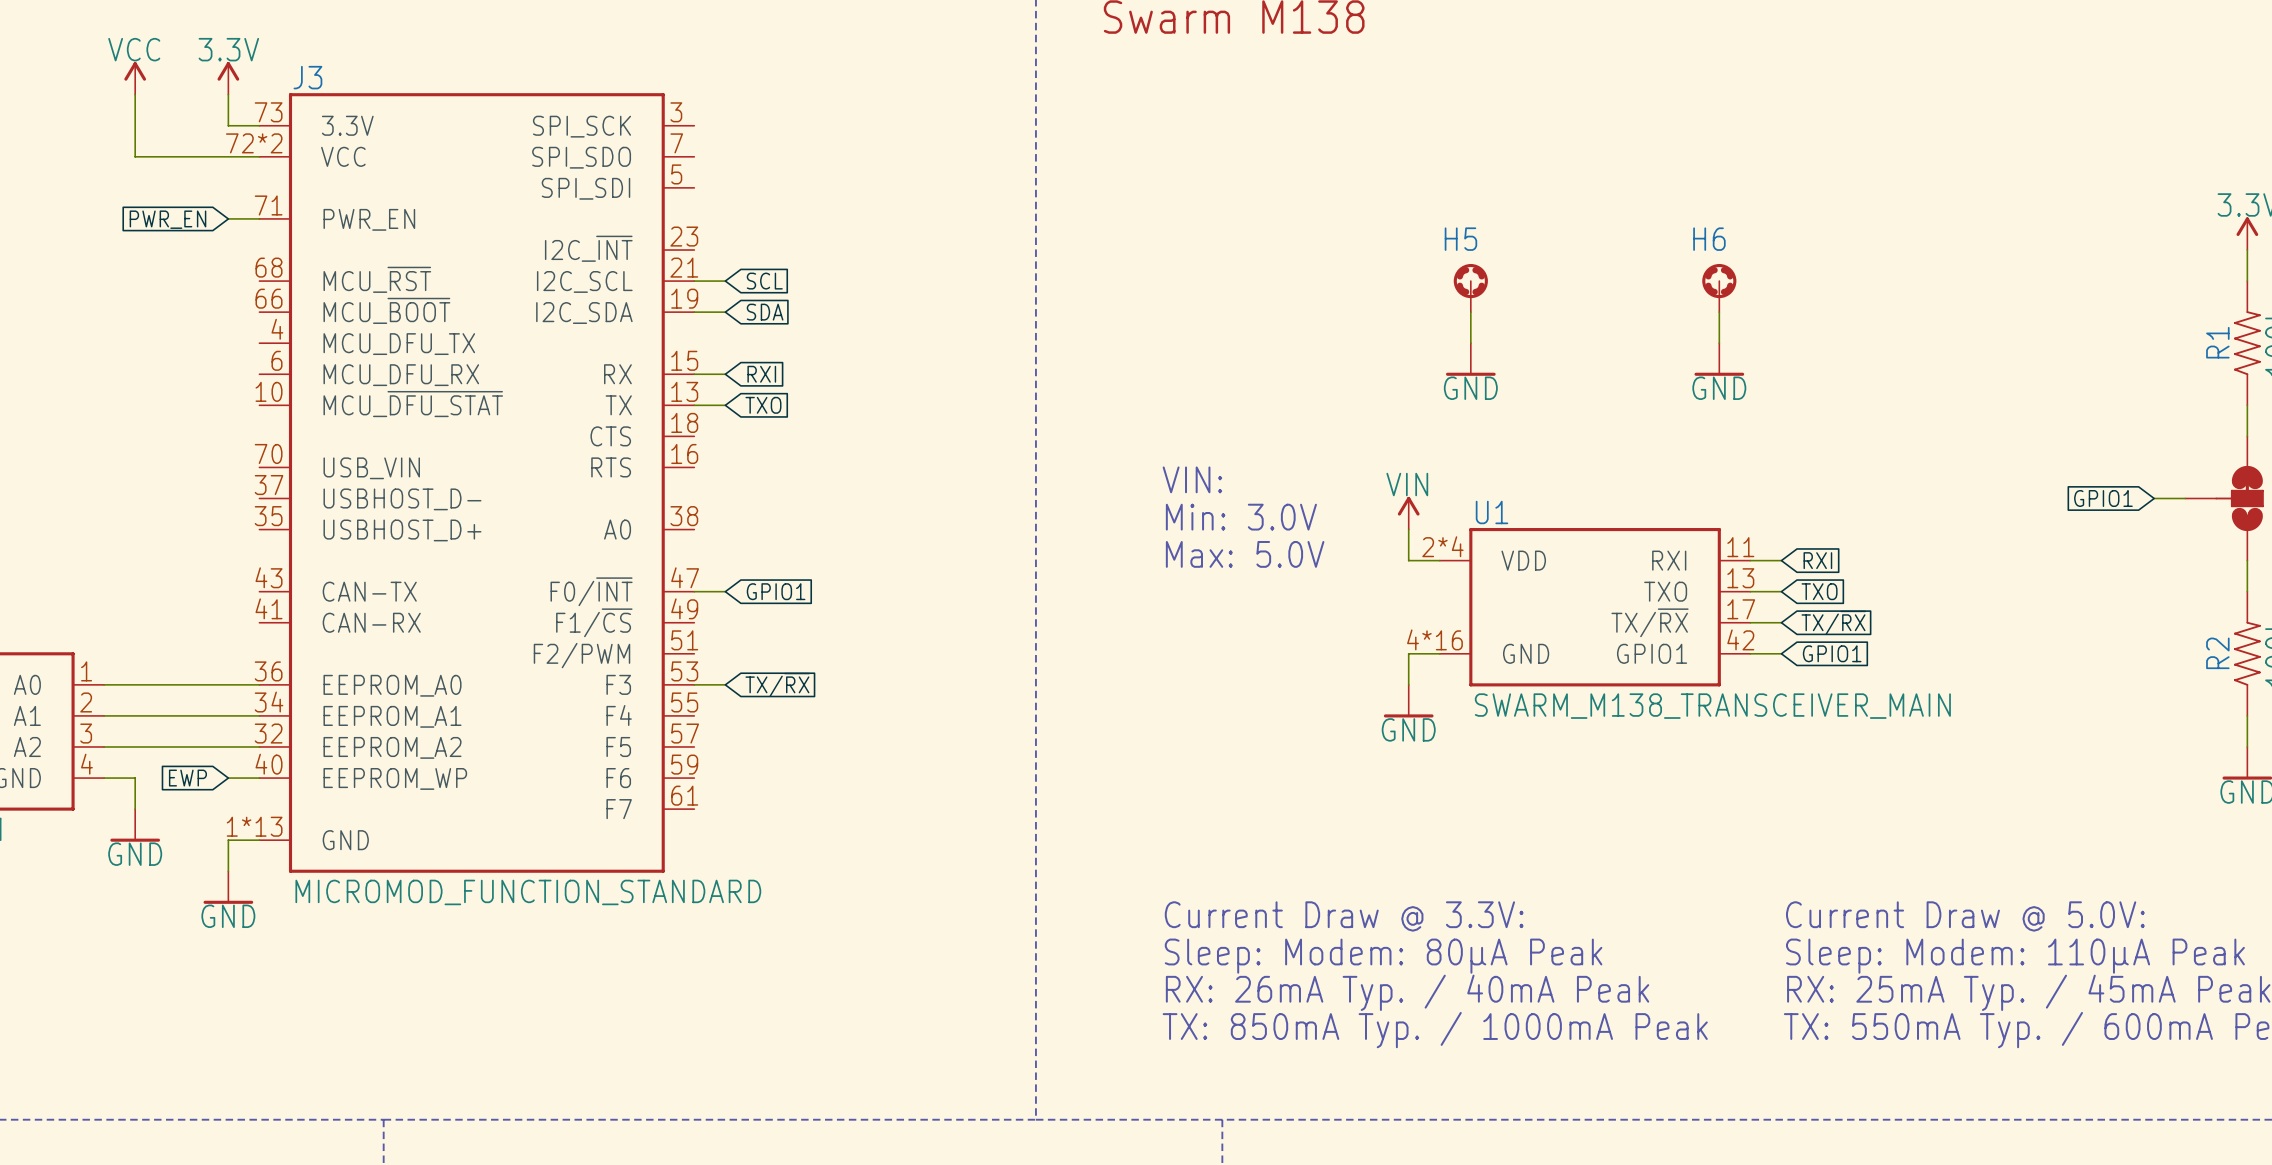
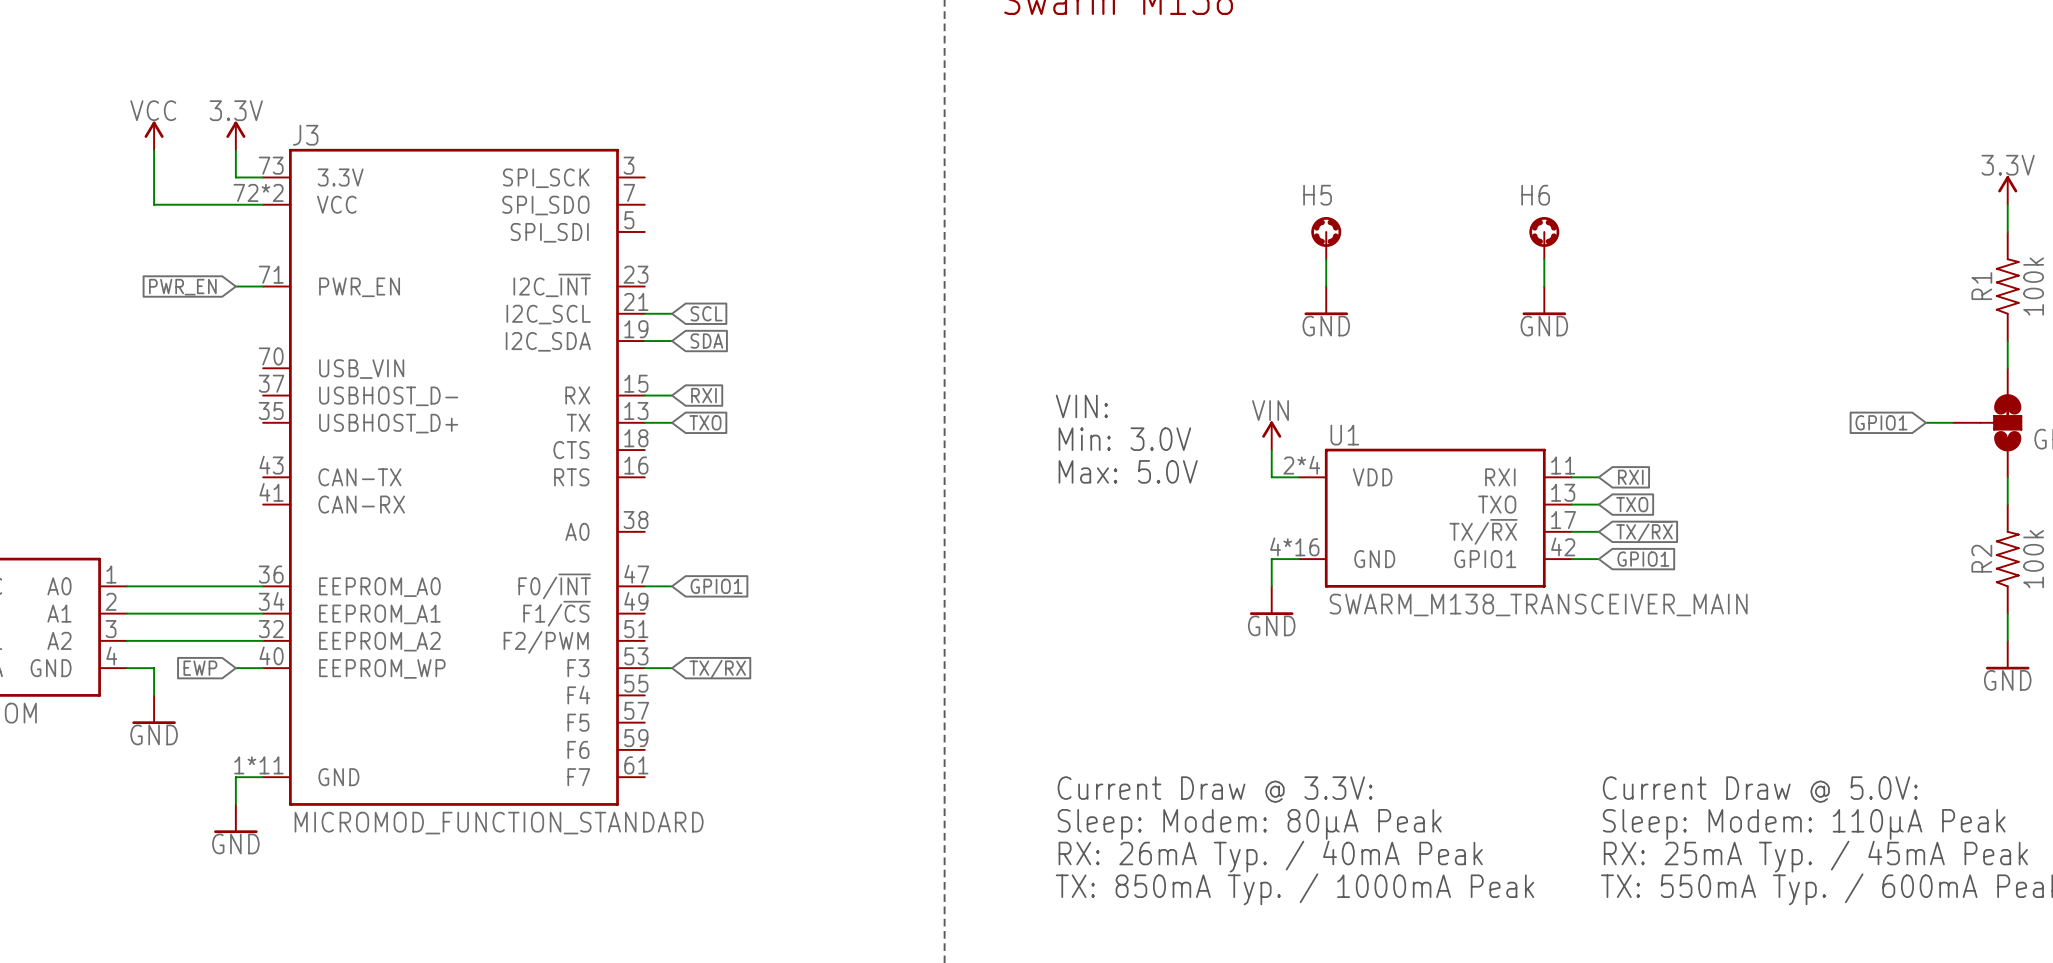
power symbol position: VCC (135, 78) -> VCC (154, 135)
power symbol position: 3.3V (228, 78) -> 3.3V (235, 135)
J3 symbol: [259, 93, 695, 873] -> [263, 148, 645, 806]
wire: (135, 94) (135, 156) (259, 156) -> (154, 150) (154, 204) (263, 204)
wire: (228, 94) (228, 125) (259, 125) -> none
wire: none -> (235, 150) (235, 177)
global label position: PWR_EN (167, 219) -> PWR_EN (182, 287)
wire: (694, 281) (725, 281) -> (644, 395) (672, 395)
global label: SCL (764, 281) -> none
wire: (694, 312) (725, 312) -> (644, 422) (672, 422)
global label: SDA (765, 312) -> none
wire: none -> (235, 286) (263, 286)
global label: RXI (761, 374) -> SCL (706, 313)
global label: TXO (763, 405) -> SDA (706, 341)
global label: none -> RXI (703, 395)
global label: none -> TXO (705, 422)
wire: (694, 591) (725, 591) -> (644, 668) (672, 668)
global label: GPIO1 (776, 591) -> none
global label: TX/~{RX} (777, 684) -> GPIO1 (716, 586)
global label: none -> TX/~{RX} (717, 668)
wire: (259, 840) (228, 840) (228, 871) -> (263, 777) (235, 777) (235, 804)
power symbol position: GND (228, 887) -> GND (235, 818)

